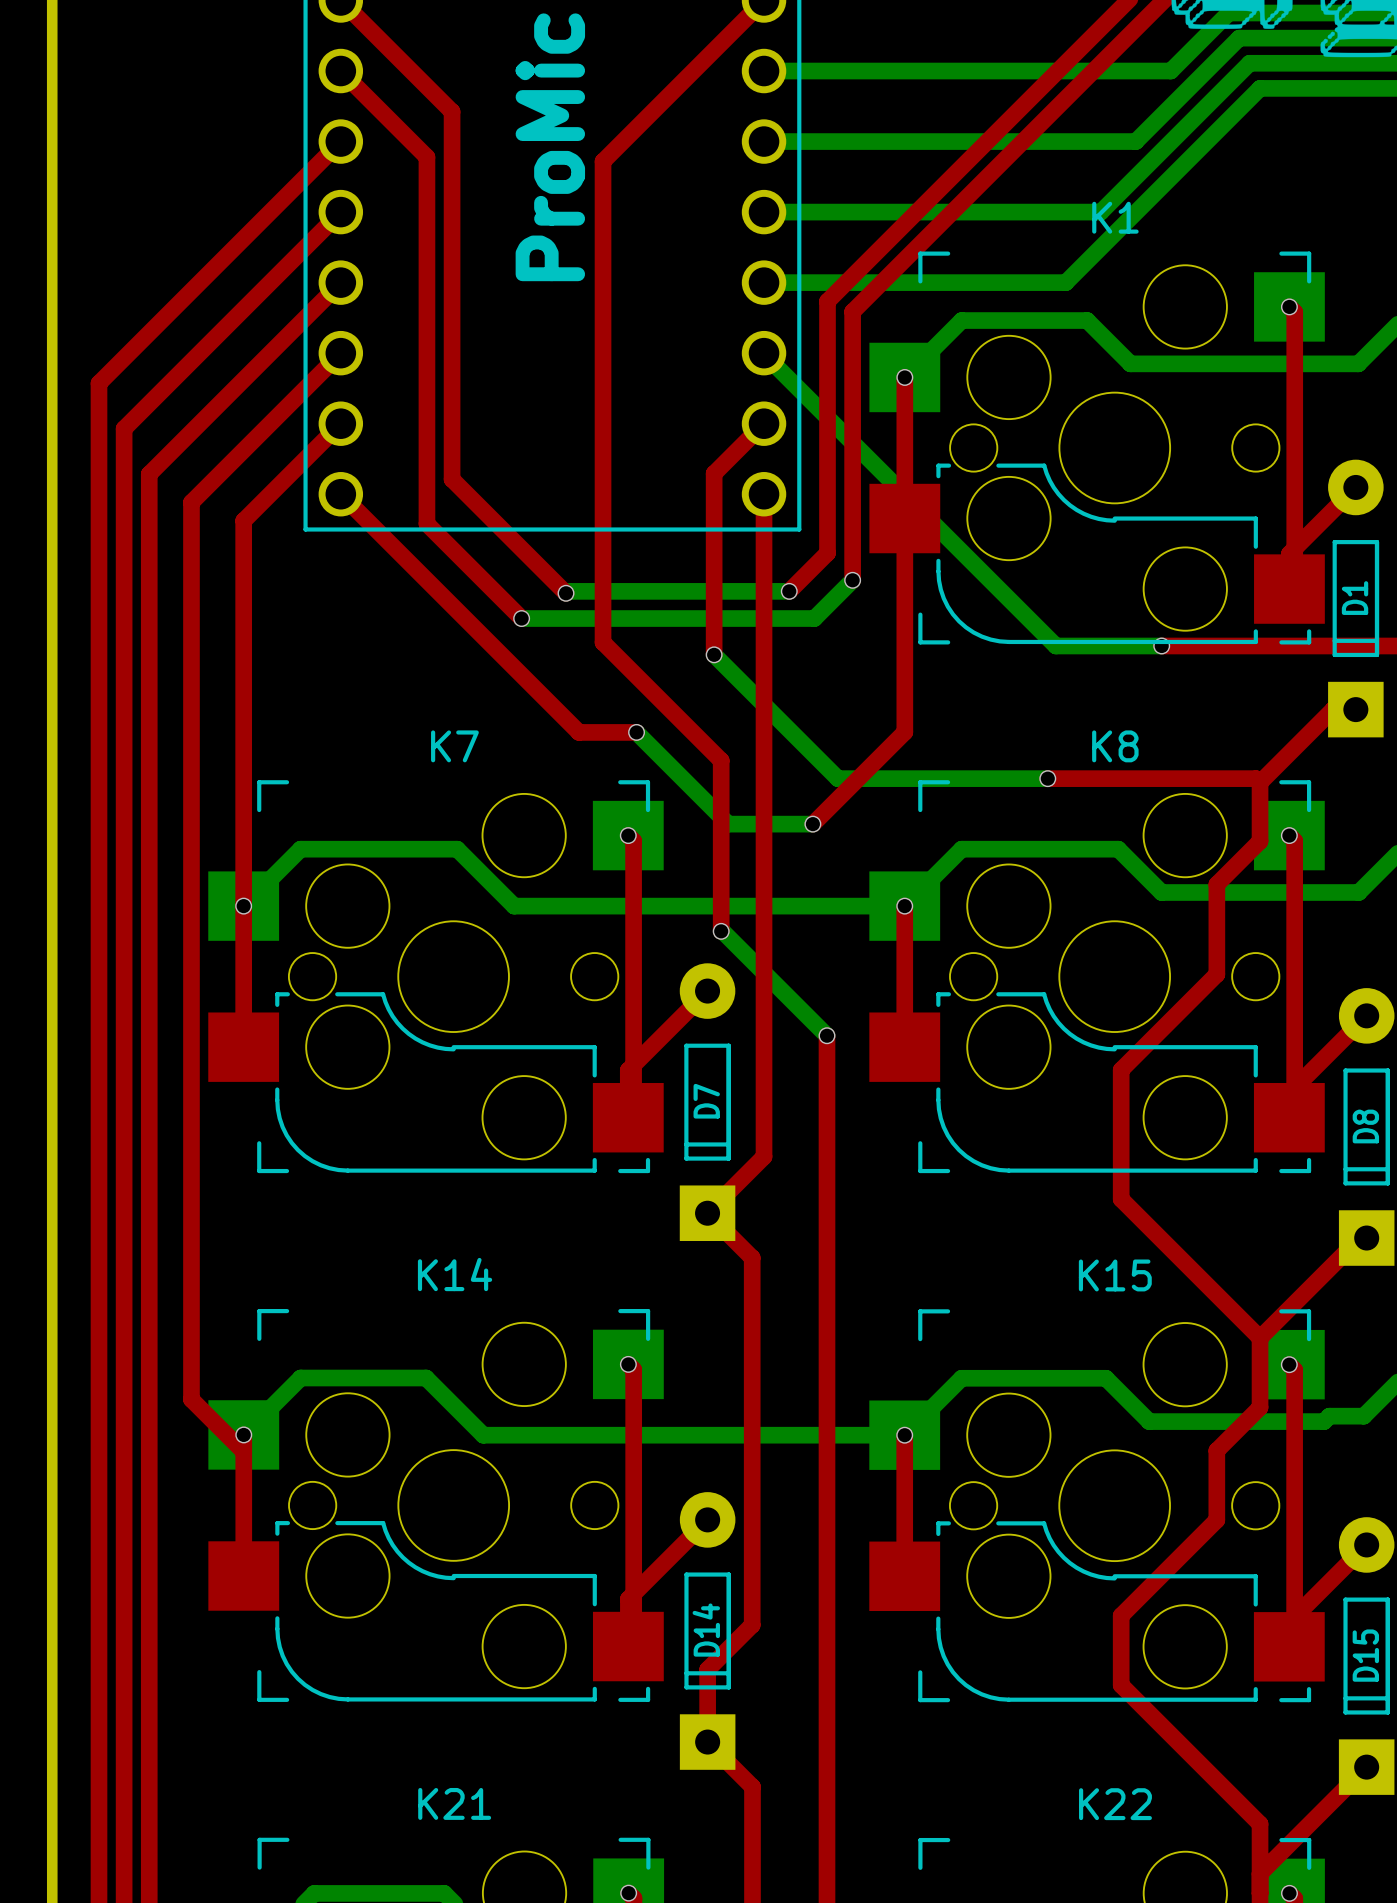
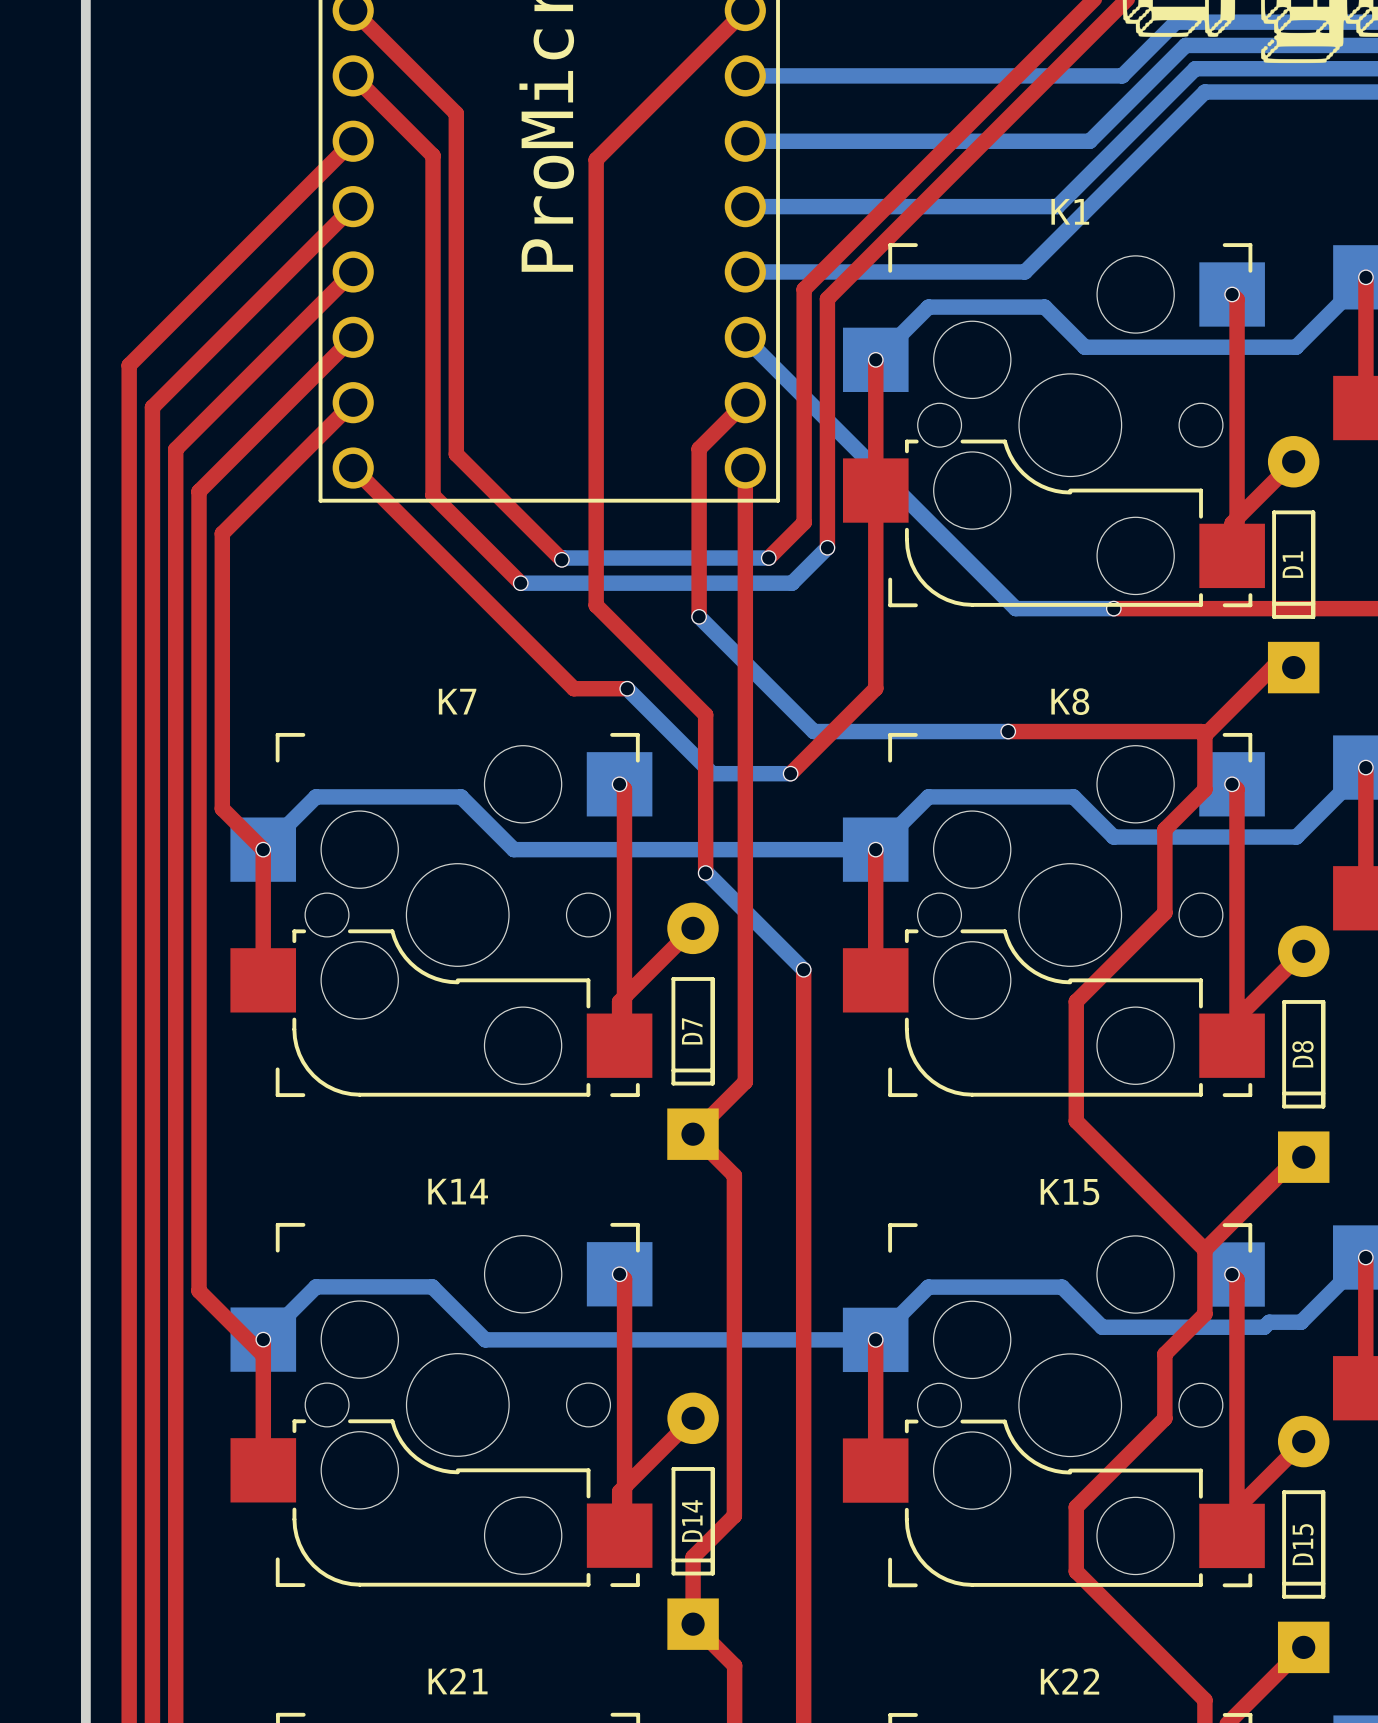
top track: (191, 502) (191, 1399) -> (214, 475) (199, 491) (199, 1290) (214, 1306)
top track: (243, 520) (243, 906) -> (263, 492) (222, 533) (222, 808) (263, 849)

